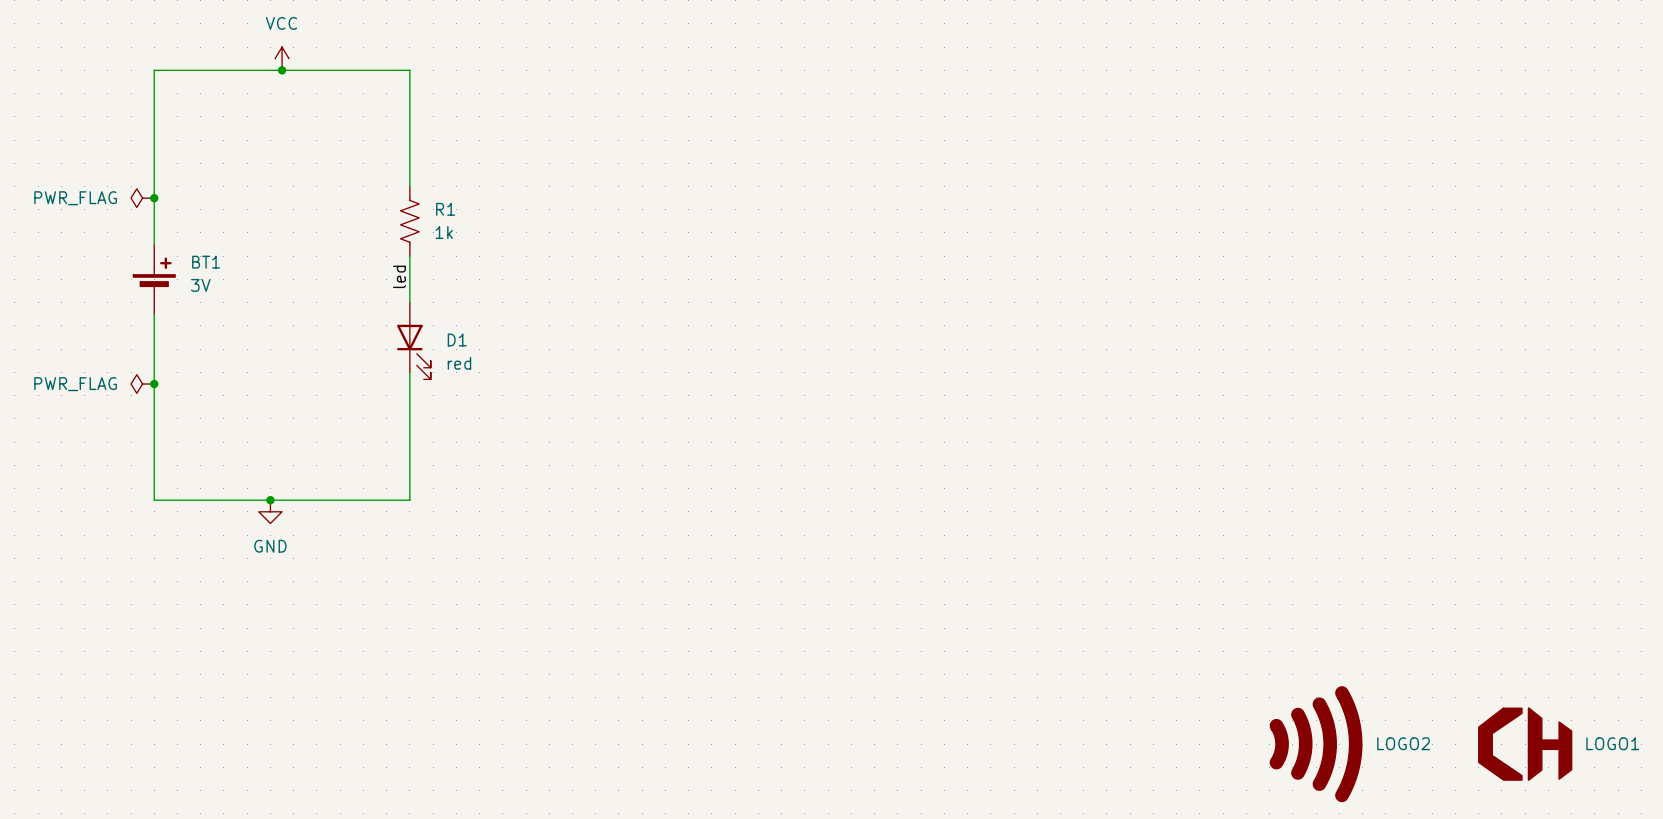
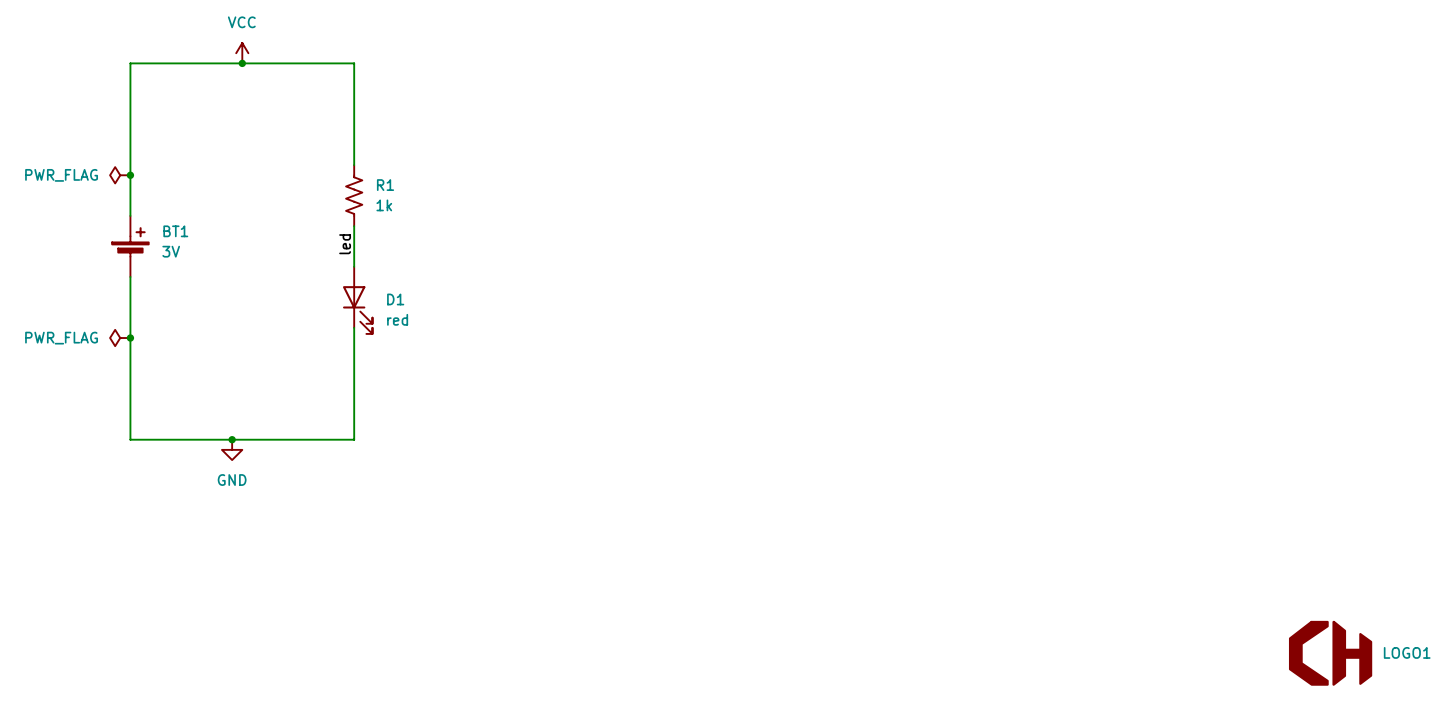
LOGO2: (1316, 744) -> none

